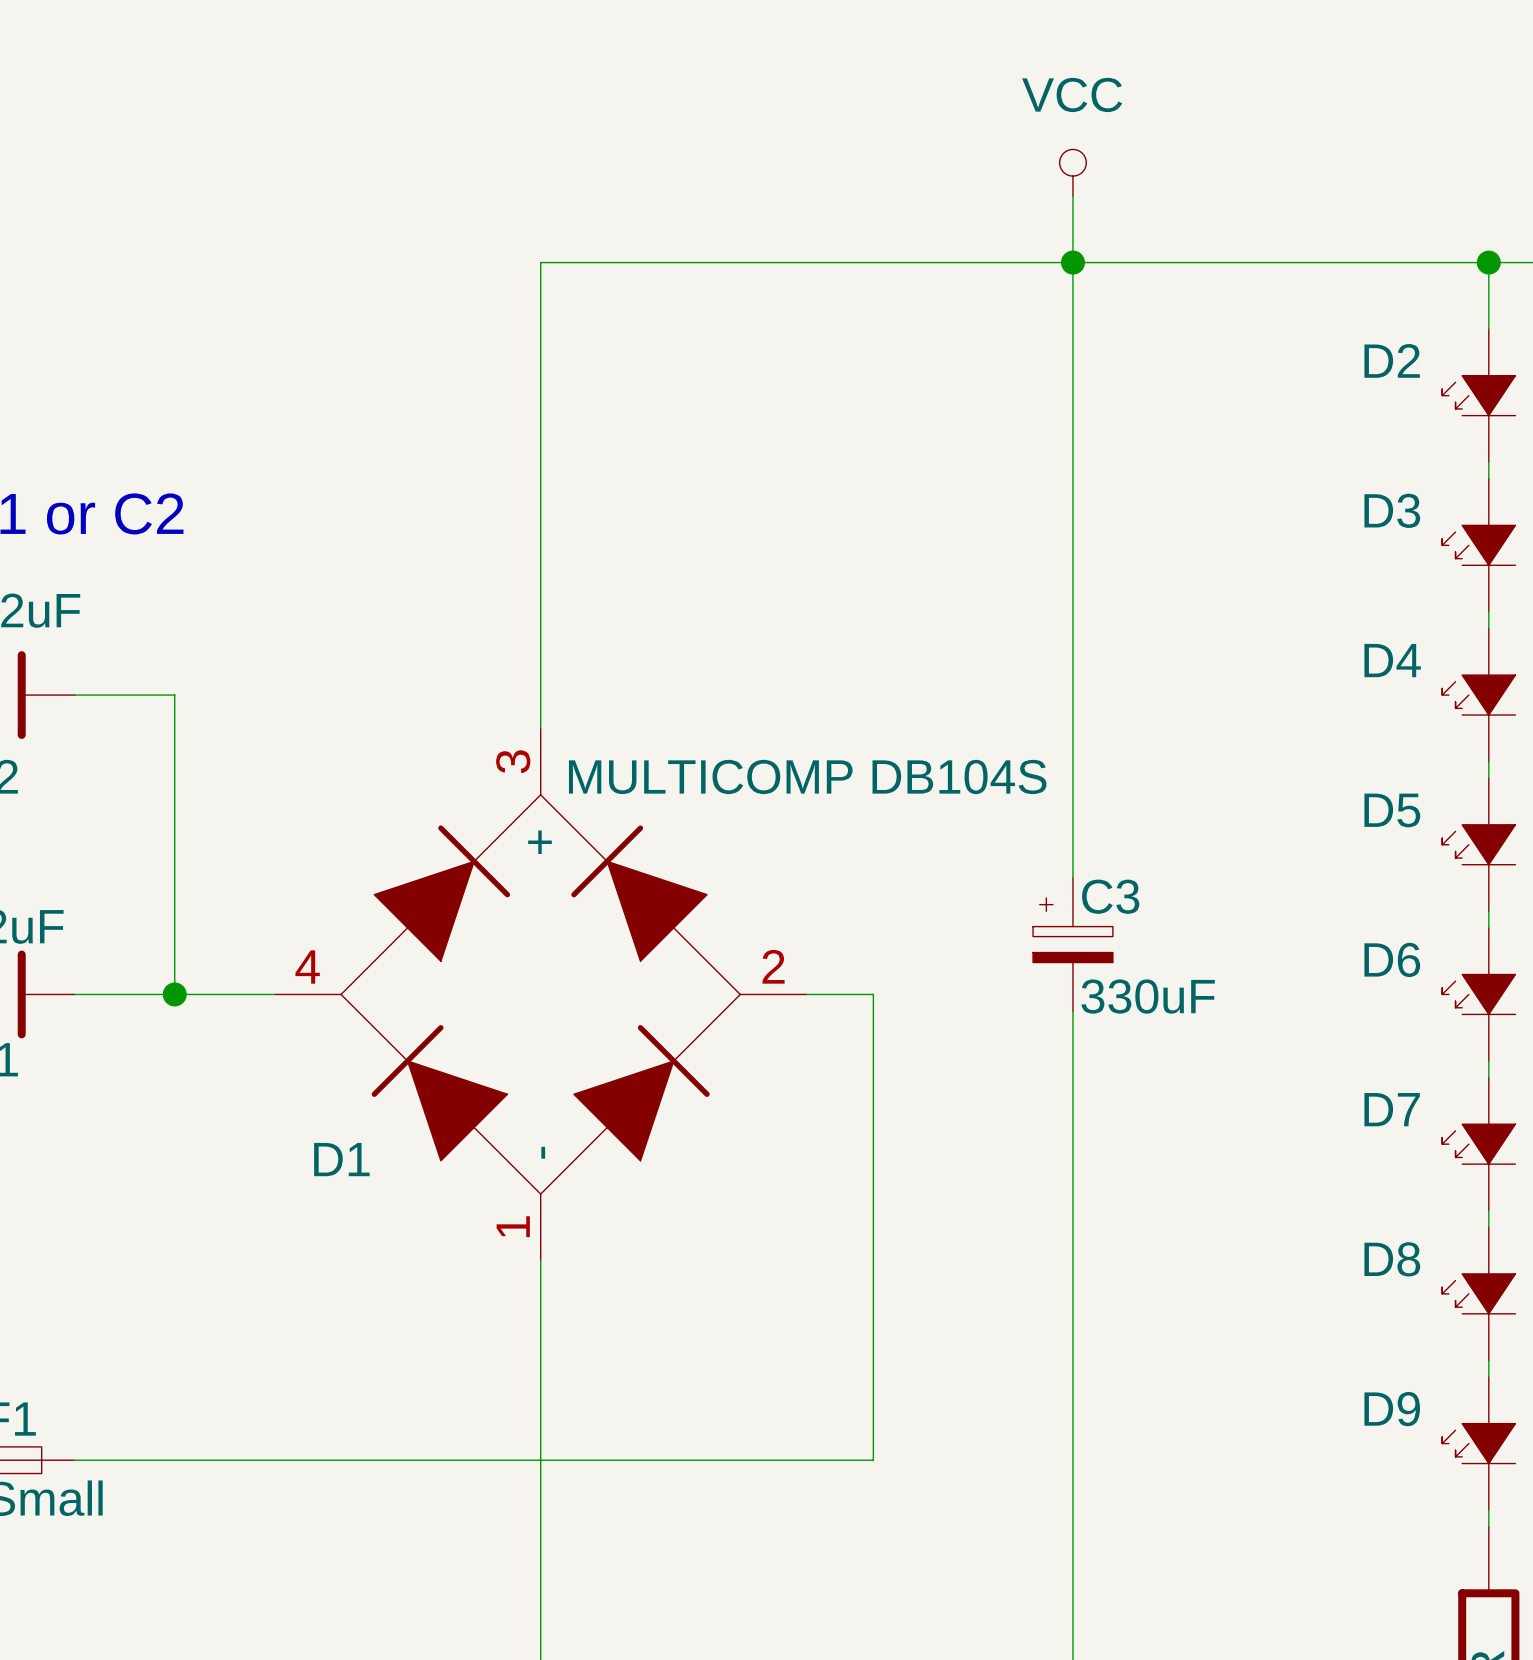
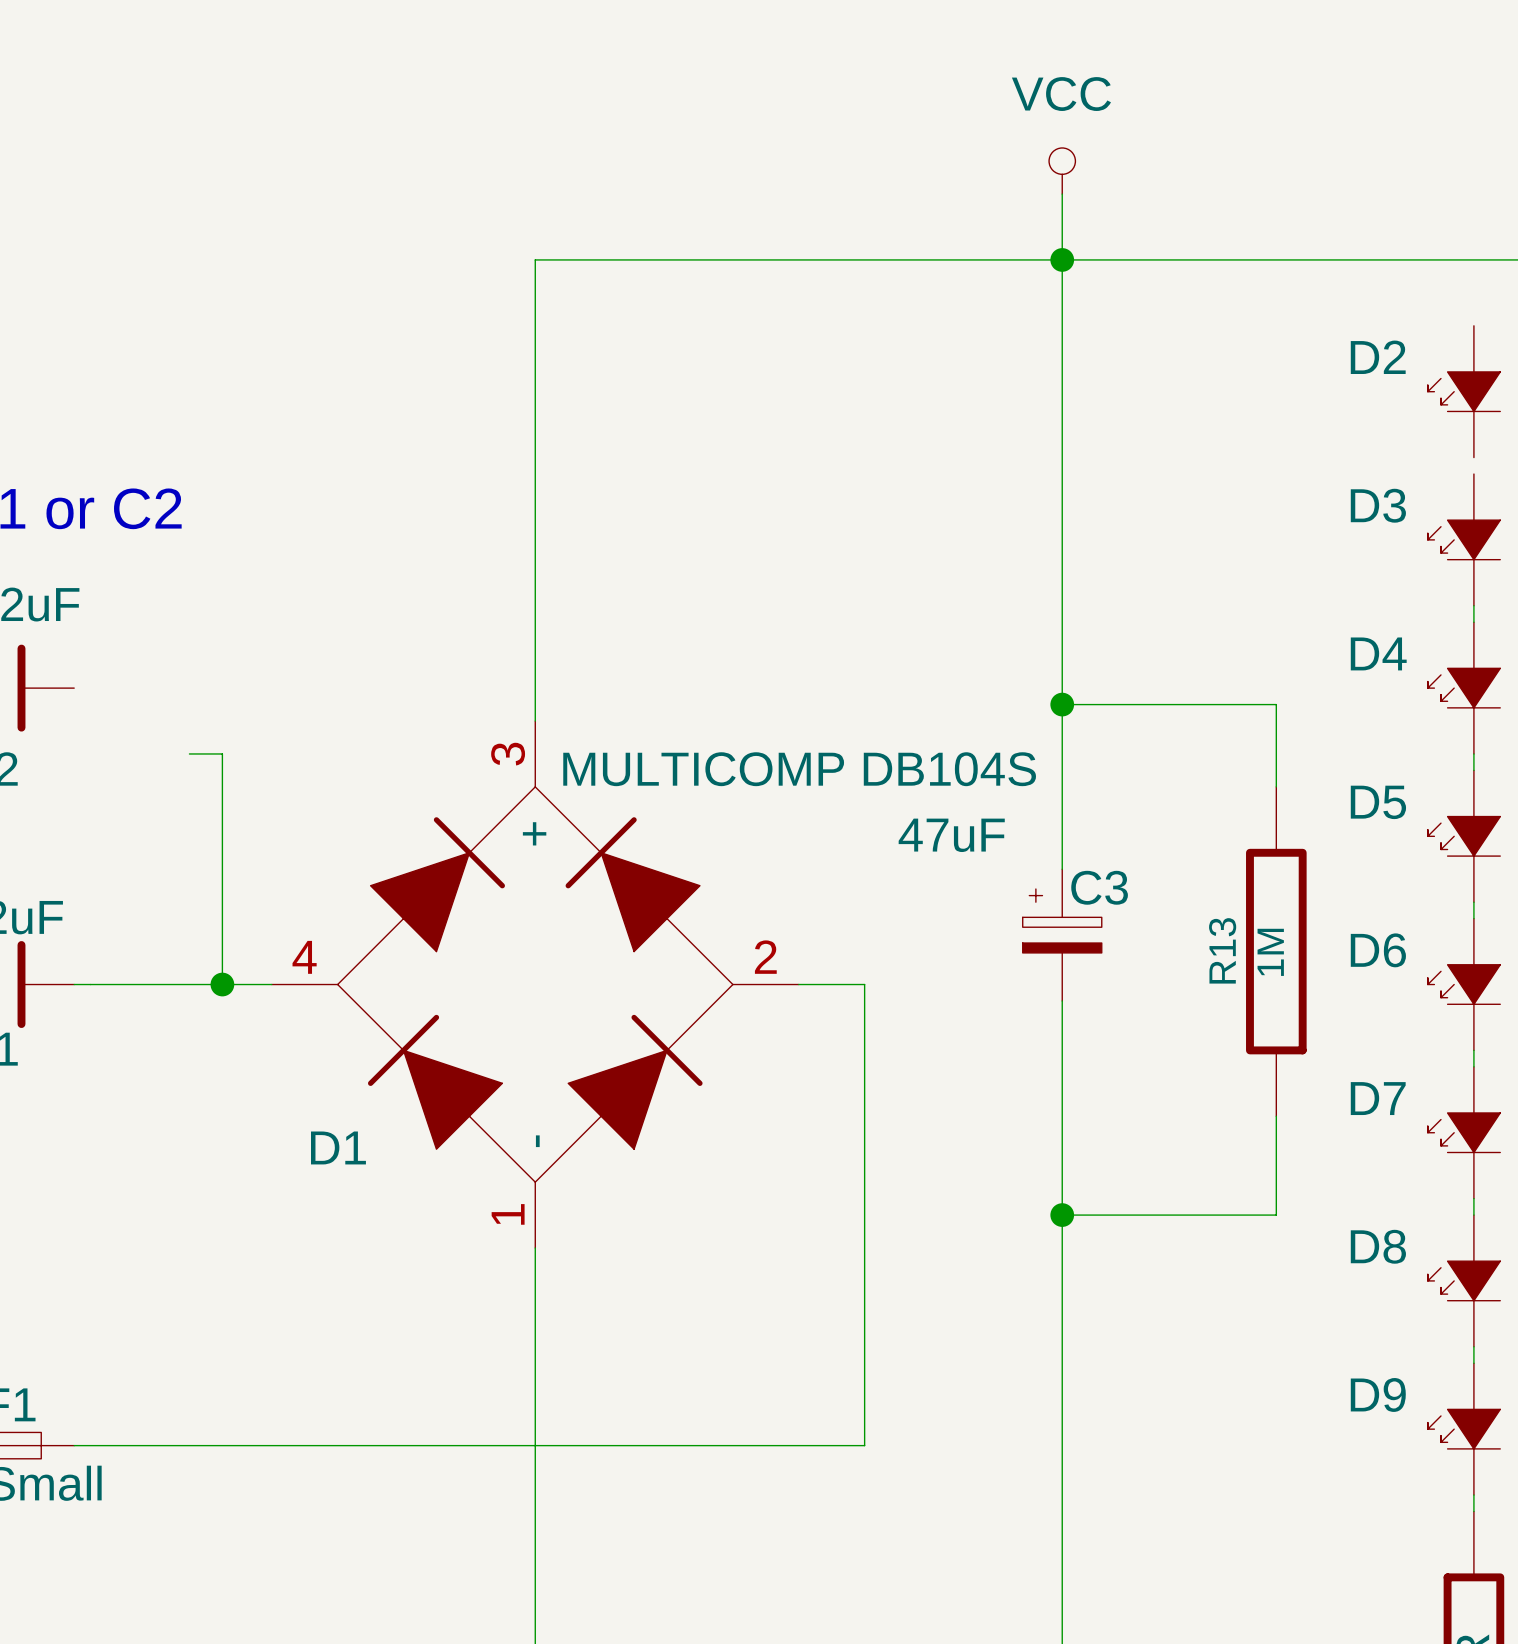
wire: (1488, 262) (1488, 329) -> none
junction: (1488, 262) -> none
wire: (1488, 462) (1488, 478) -> none
wire: (74, 695) (174, 695) (174, 994) -> none
wire: none -> (1062, 704) (1276, 704) (1276, 786)
junction: none -> (1062, 704)
wire: none -> (189, 753) (222, 753) (222, 984)
R13: none -> 1M (1276, 951)
junction position: (174, 994) -> (222, 984)
C3 value: 330uF (1148, 996) -> 47uF (951, 835)
wire: none -> (1276, 1116) (1276, 1215) (1062, 1215)
junction: none -> (1062, 1215)

